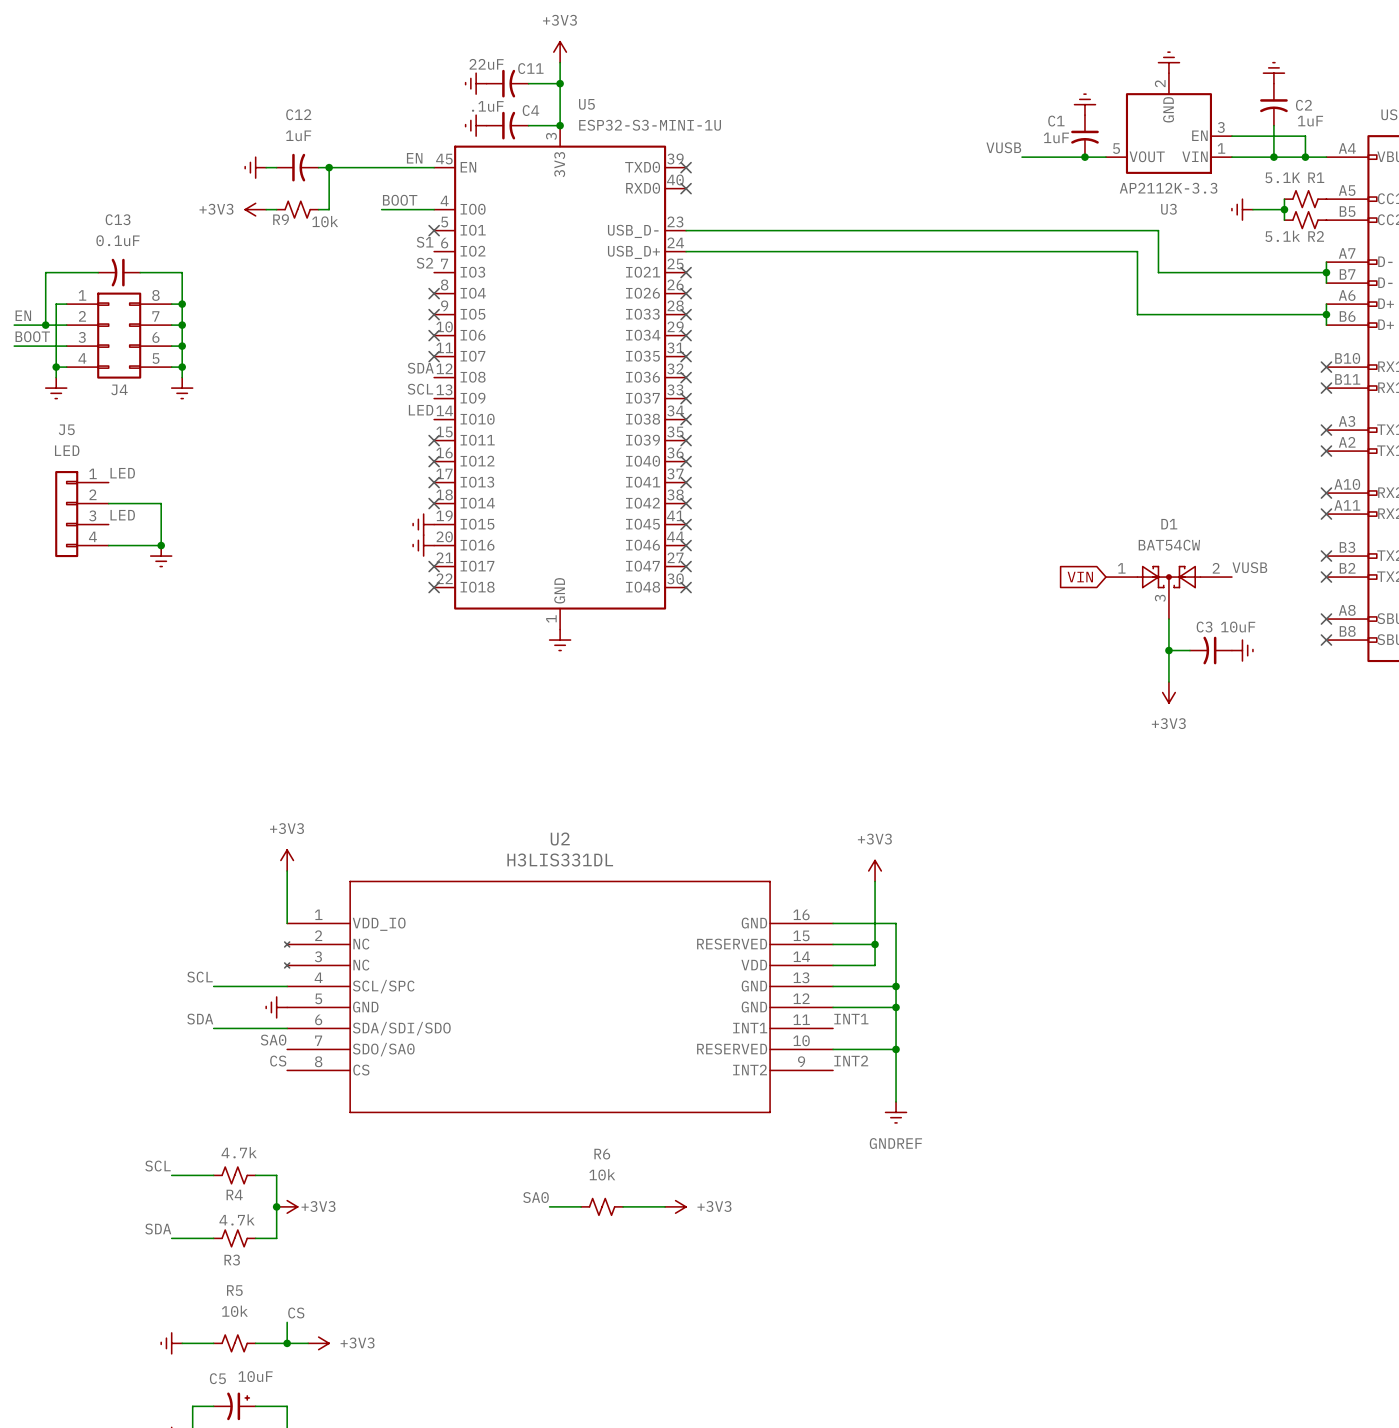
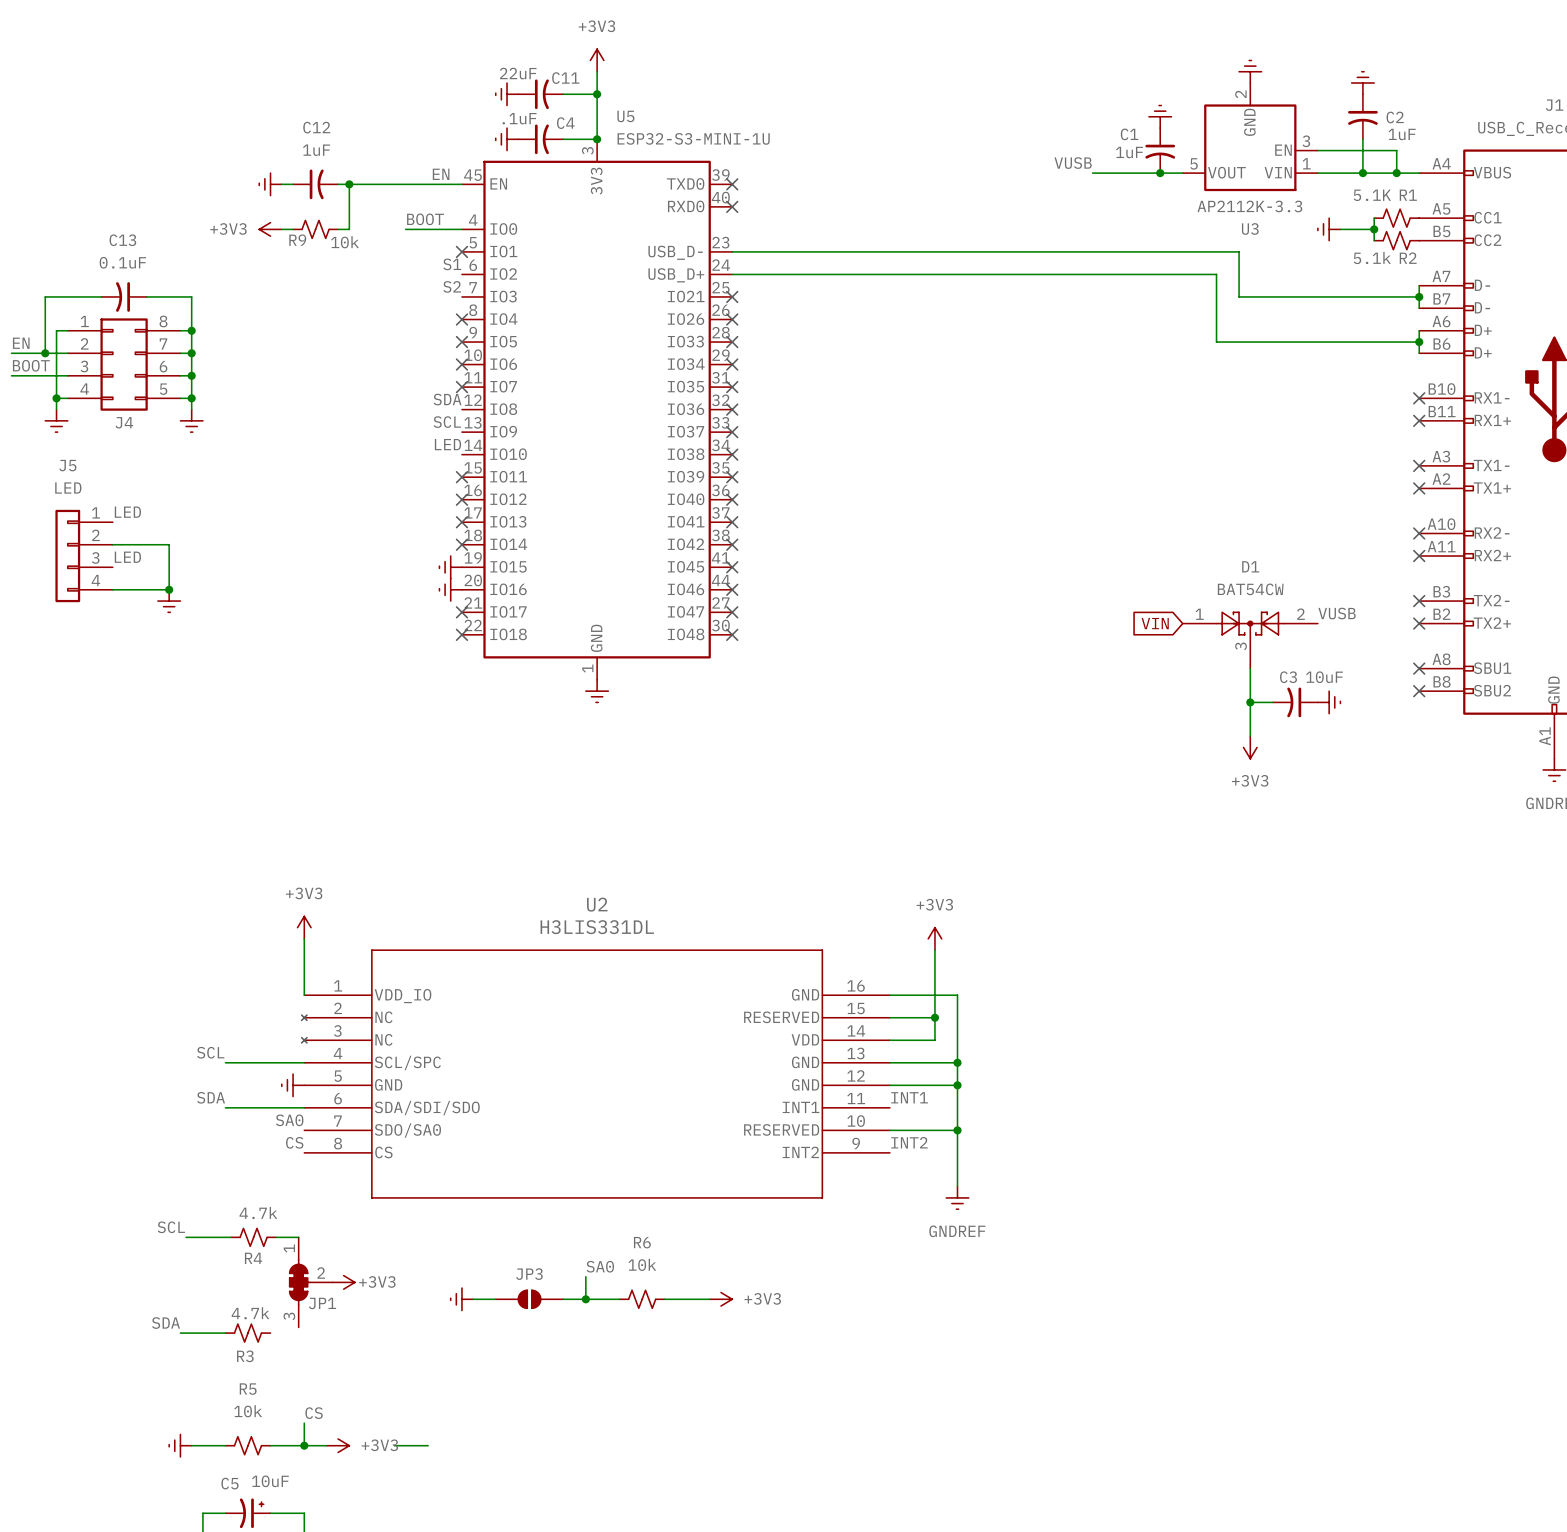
wire: none -> (276, 1237) (298, 1237)
label position: SCL (158, 1166) -> SCL (171, 1227)
wire: (171, 1175) (213, 1175) -> (186, 1237) (231, 1237)
R4 position: (234, 1175) -> (253, 1237)
wire: (255, 1175) (276, 1175) (276, 1238) (255, 1238) -> none
wire: none -> (585, 1276) (585, 1299) (563, 1299)
JP1: none -> (311, 1282)
label position: SA0 (535, 1197) -> SA0 (600, 1266)
junction: (276, 1206) -> none
power symbol position: +3V3 (287, 1206) -> +3V3 (343, 1282)
power symbol: none -> (461, 1299)
wire: none -> (473, 1299) (495, 1299)
JP3: none -> (529, 1299)
junction: none -> (585, 1299)
wire: none -> (394, 1445) (428, 1445)

